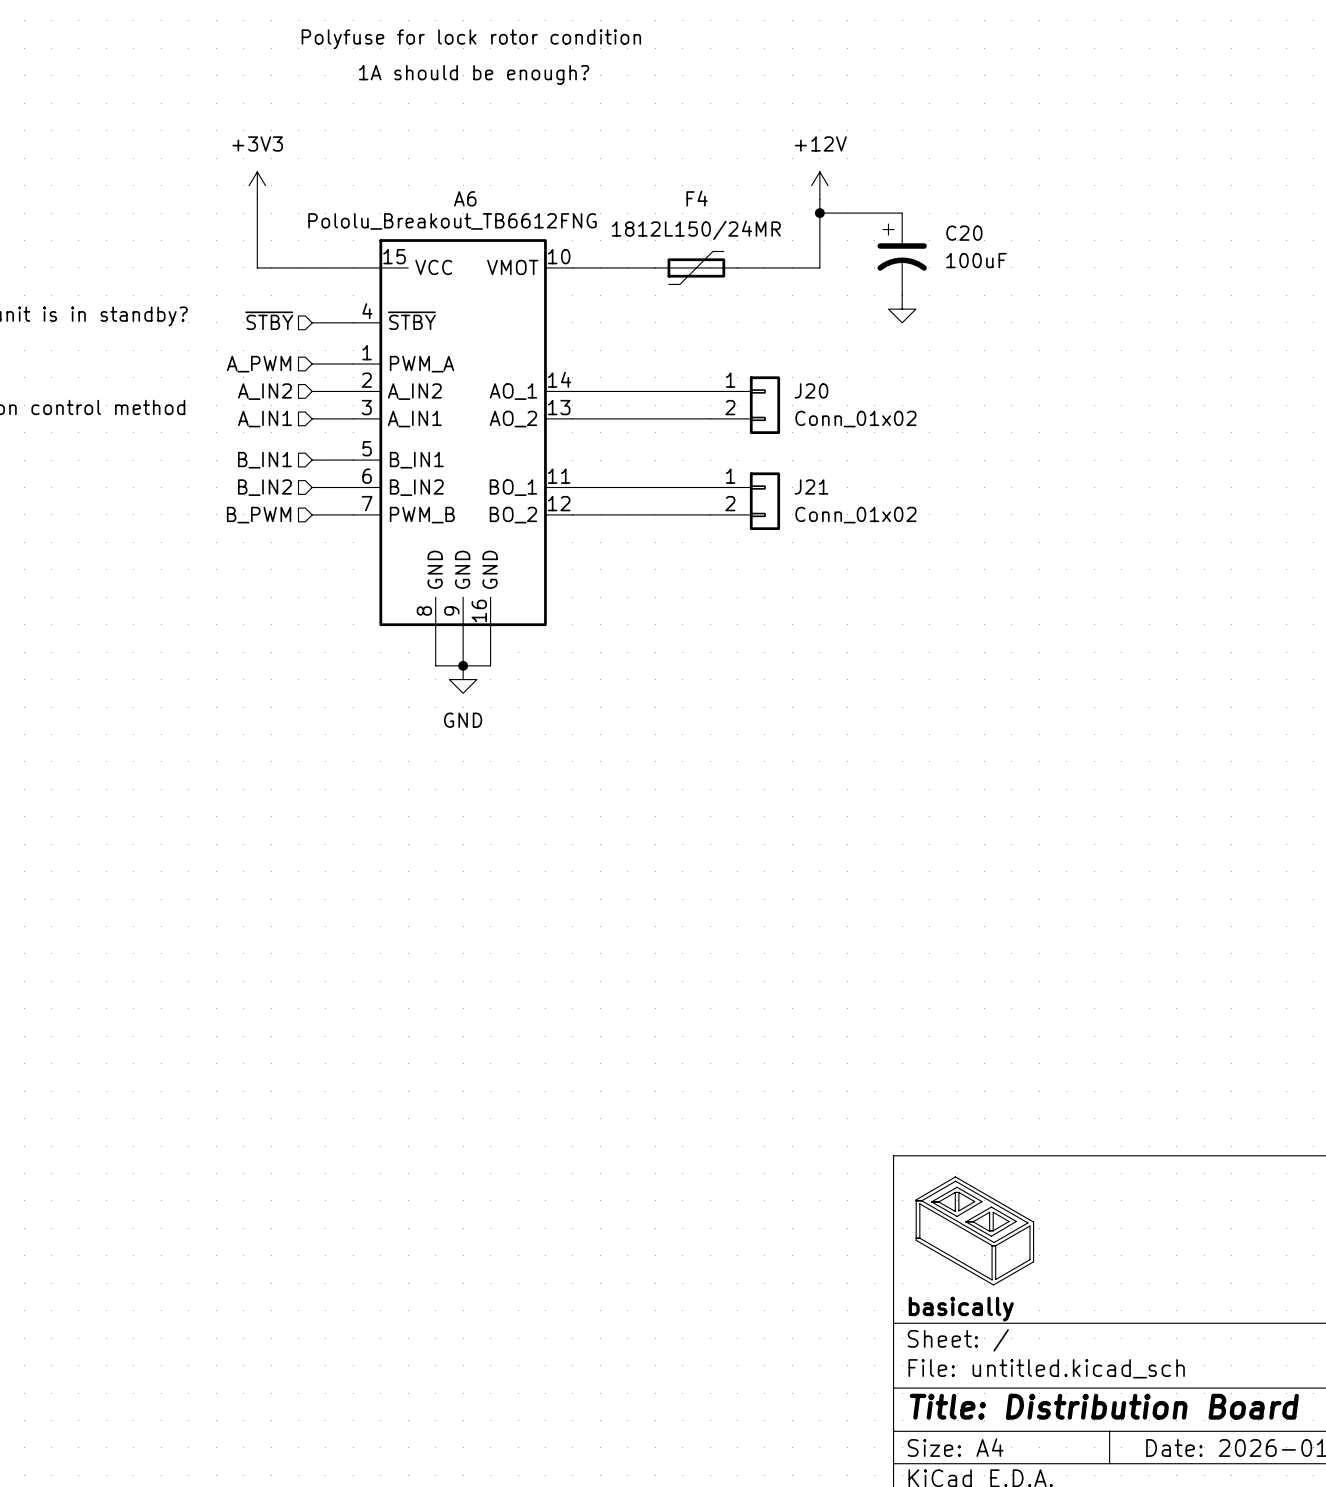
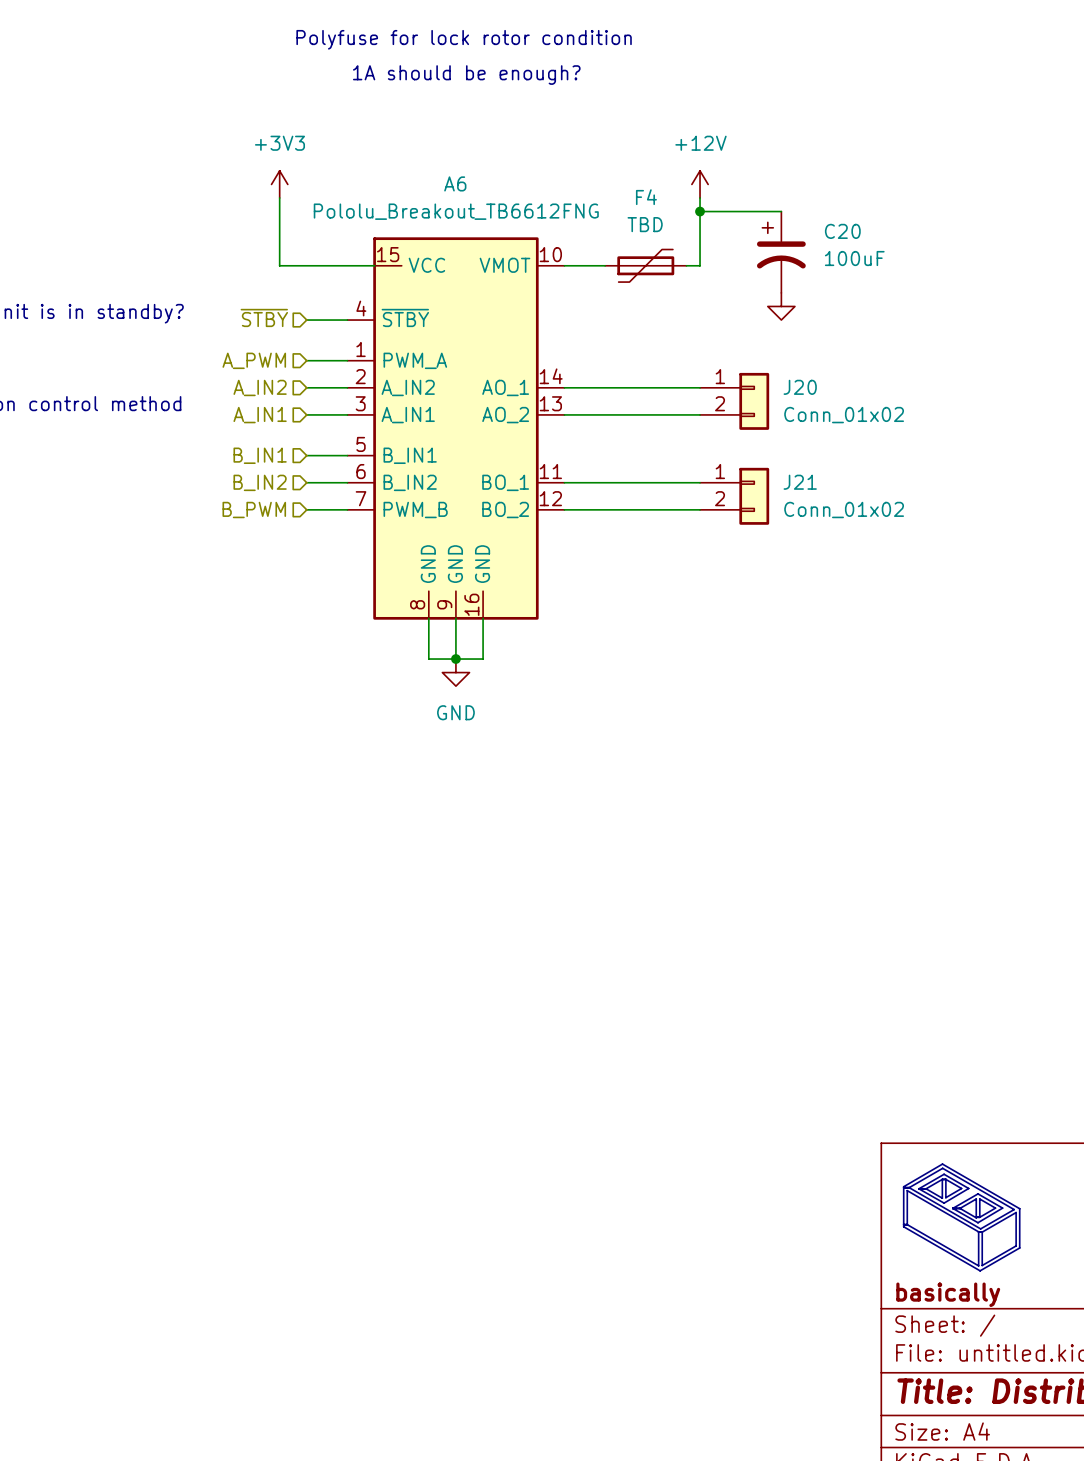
power symbol position: +3V3 (257, 185) -> +3V3 (279, 184)
power symbol position: +12V (819, 185) -> +12V (700, 184)
A6 name position: A6 (465, 198) -> A6 (455, 183)
wire: (257, 199) (257, 267) (284, 267) -> (279, 197) (279, 265)
wire: none -> (700, 197) (700, 265) (686, 265)
wire: (819, 199) (819, 267) (737, 267) -> none
junction: none -> (700, 211)
wire: (819, 213) (902, 213) -> (700, 211) (781, 211)
junction: (819, 213) -> none
A6 value position: Pololu_Breakout_TB6612FNG (452, 221) -> Pololu_Breakout_TB6612FNG (456, 211)
F4 value: 1812L150/24MR (696, 230) -> TBD (645, 224)
C20 position: (902, 254) -> (781, 252)
F4 position: (696, 267) -> (645, 265)
power symbol position: (902, 309) -> (781, 306)

